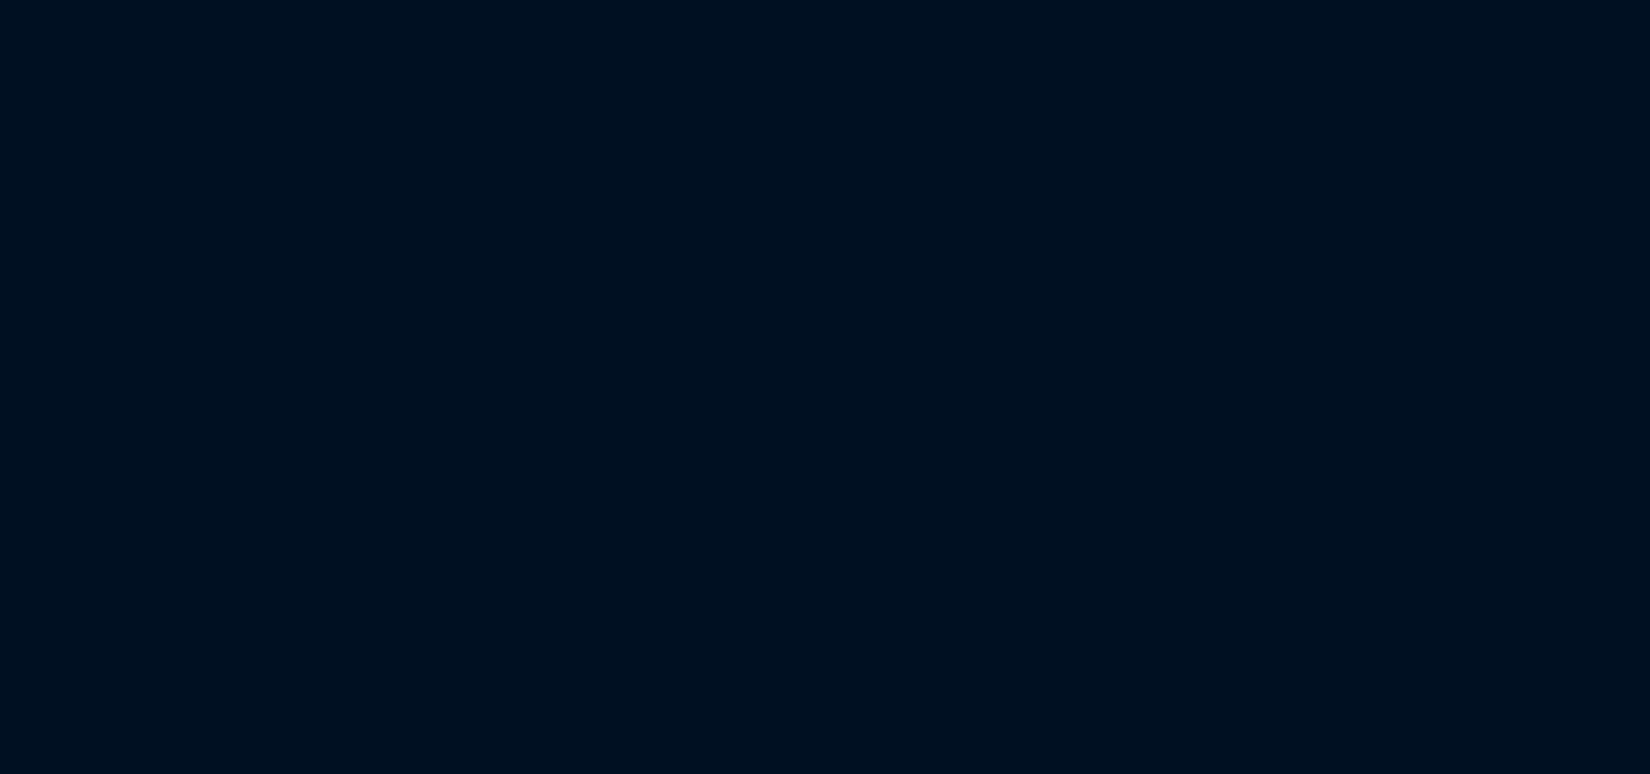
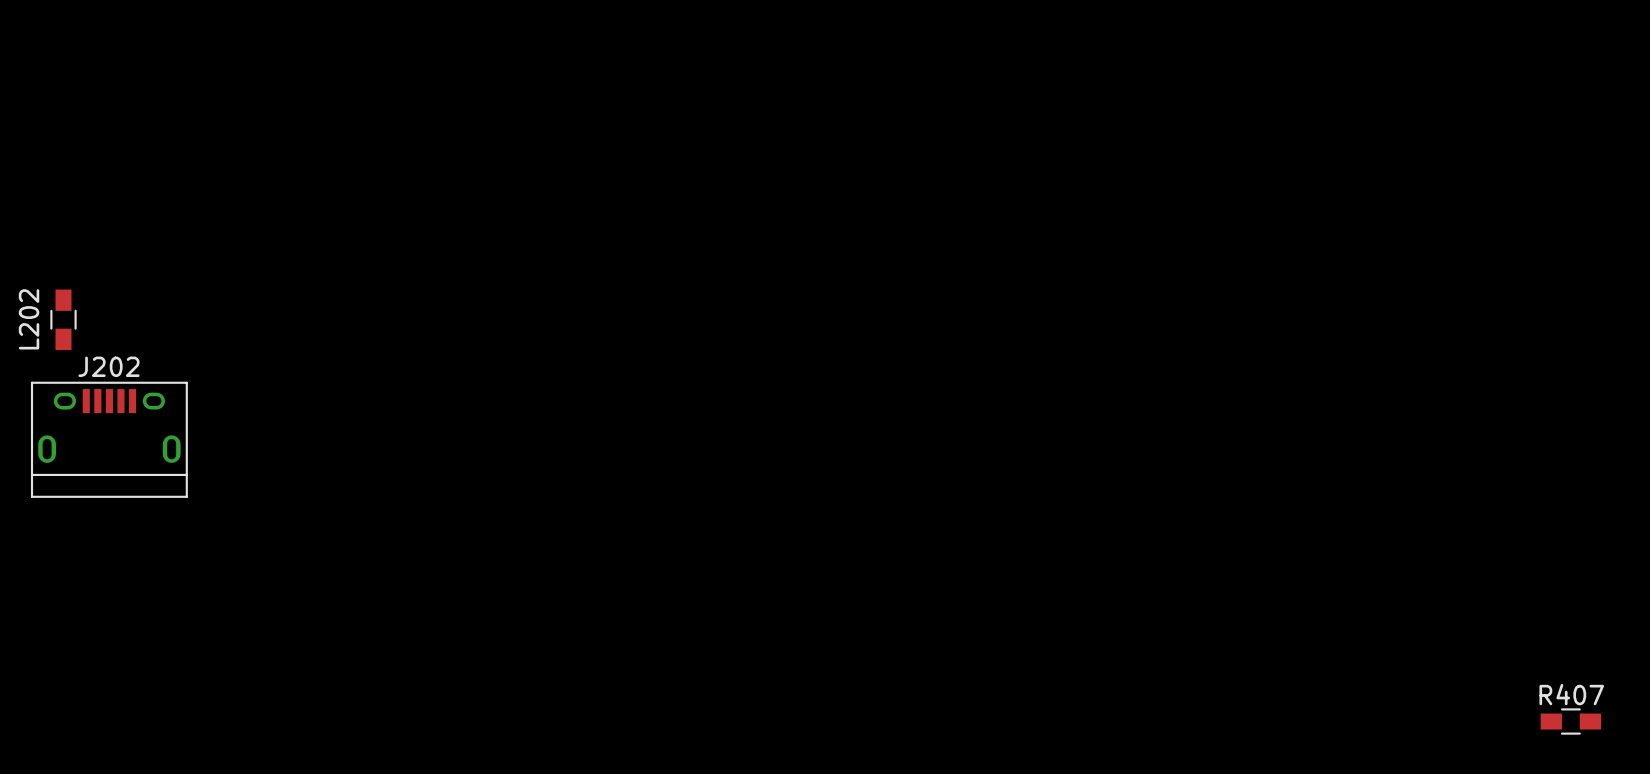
L202: none -> (63, 319)
J202: none -> (109, 439)
R407: none -> (1570, 721)

